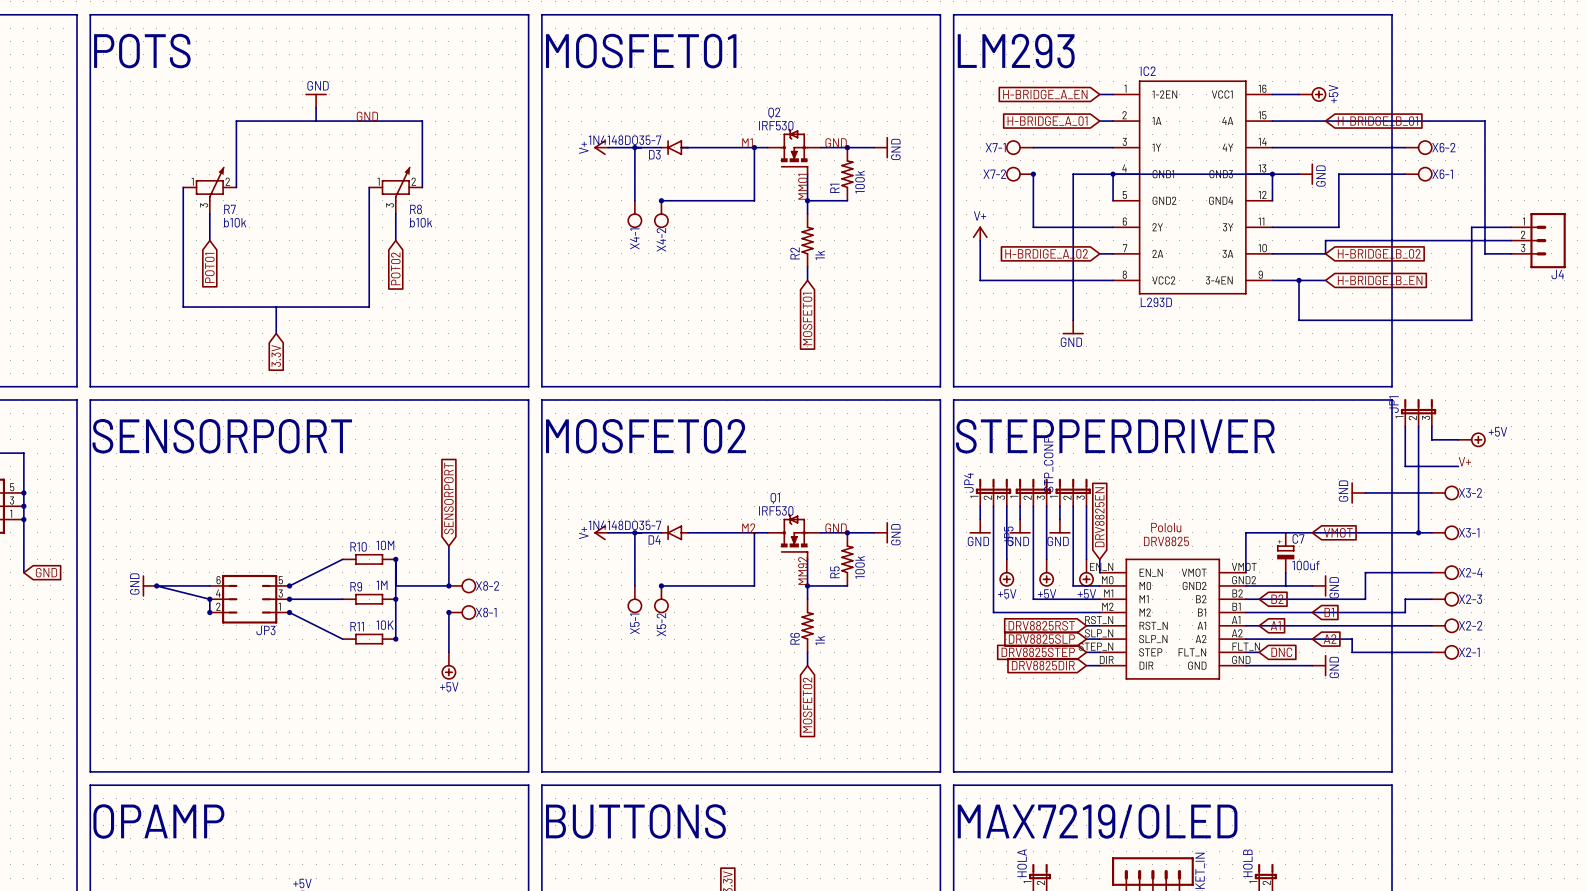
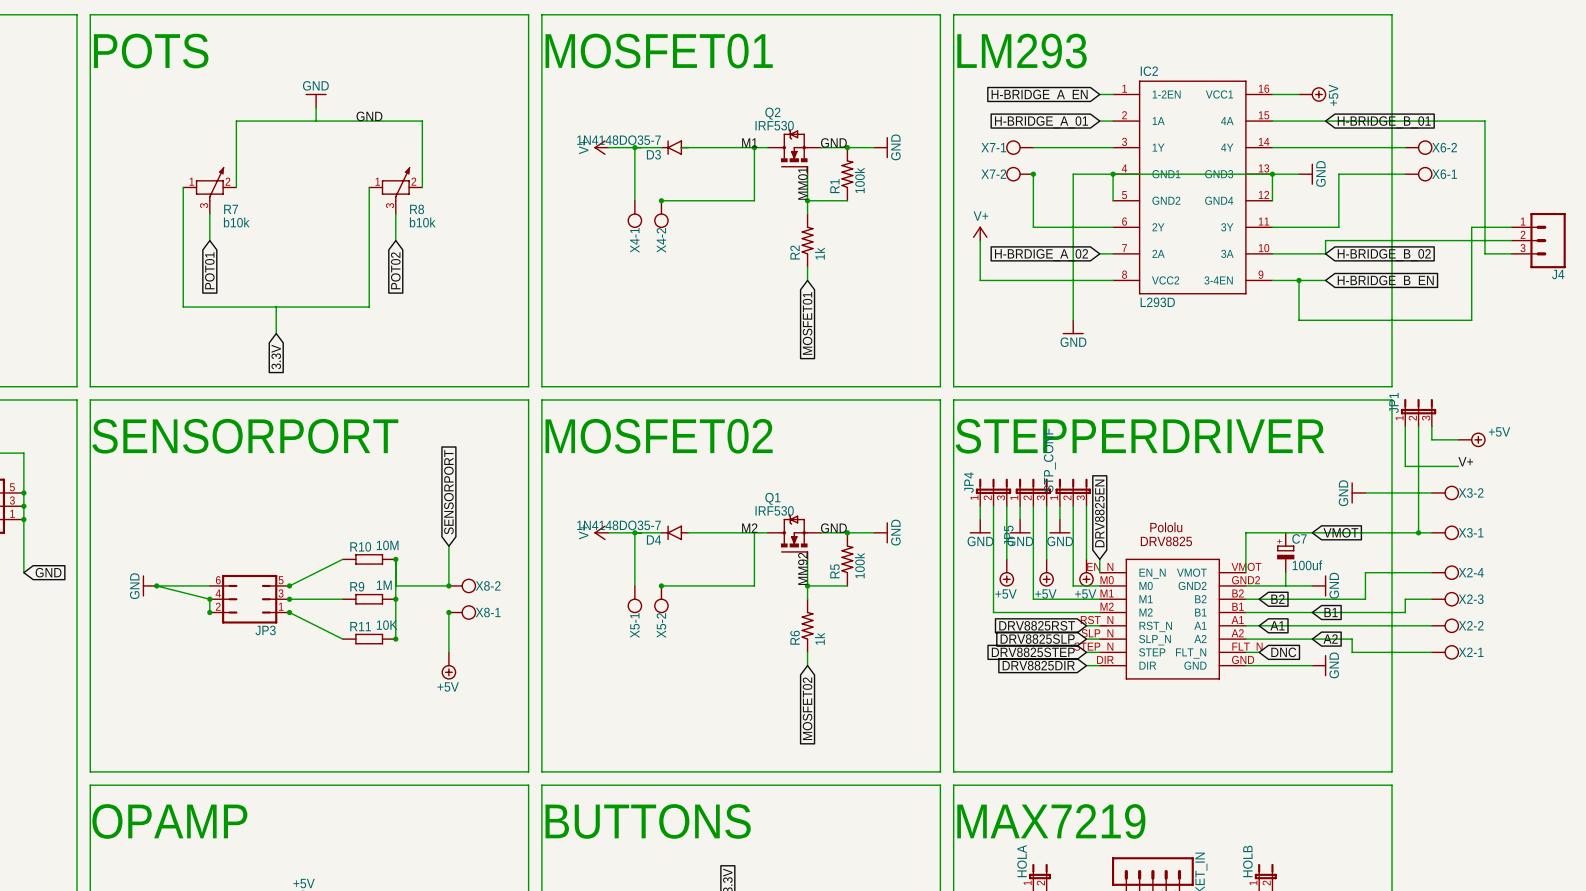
text: MAX7219/OLED (1097, 821) -> MAX7219 (1051, 821)

